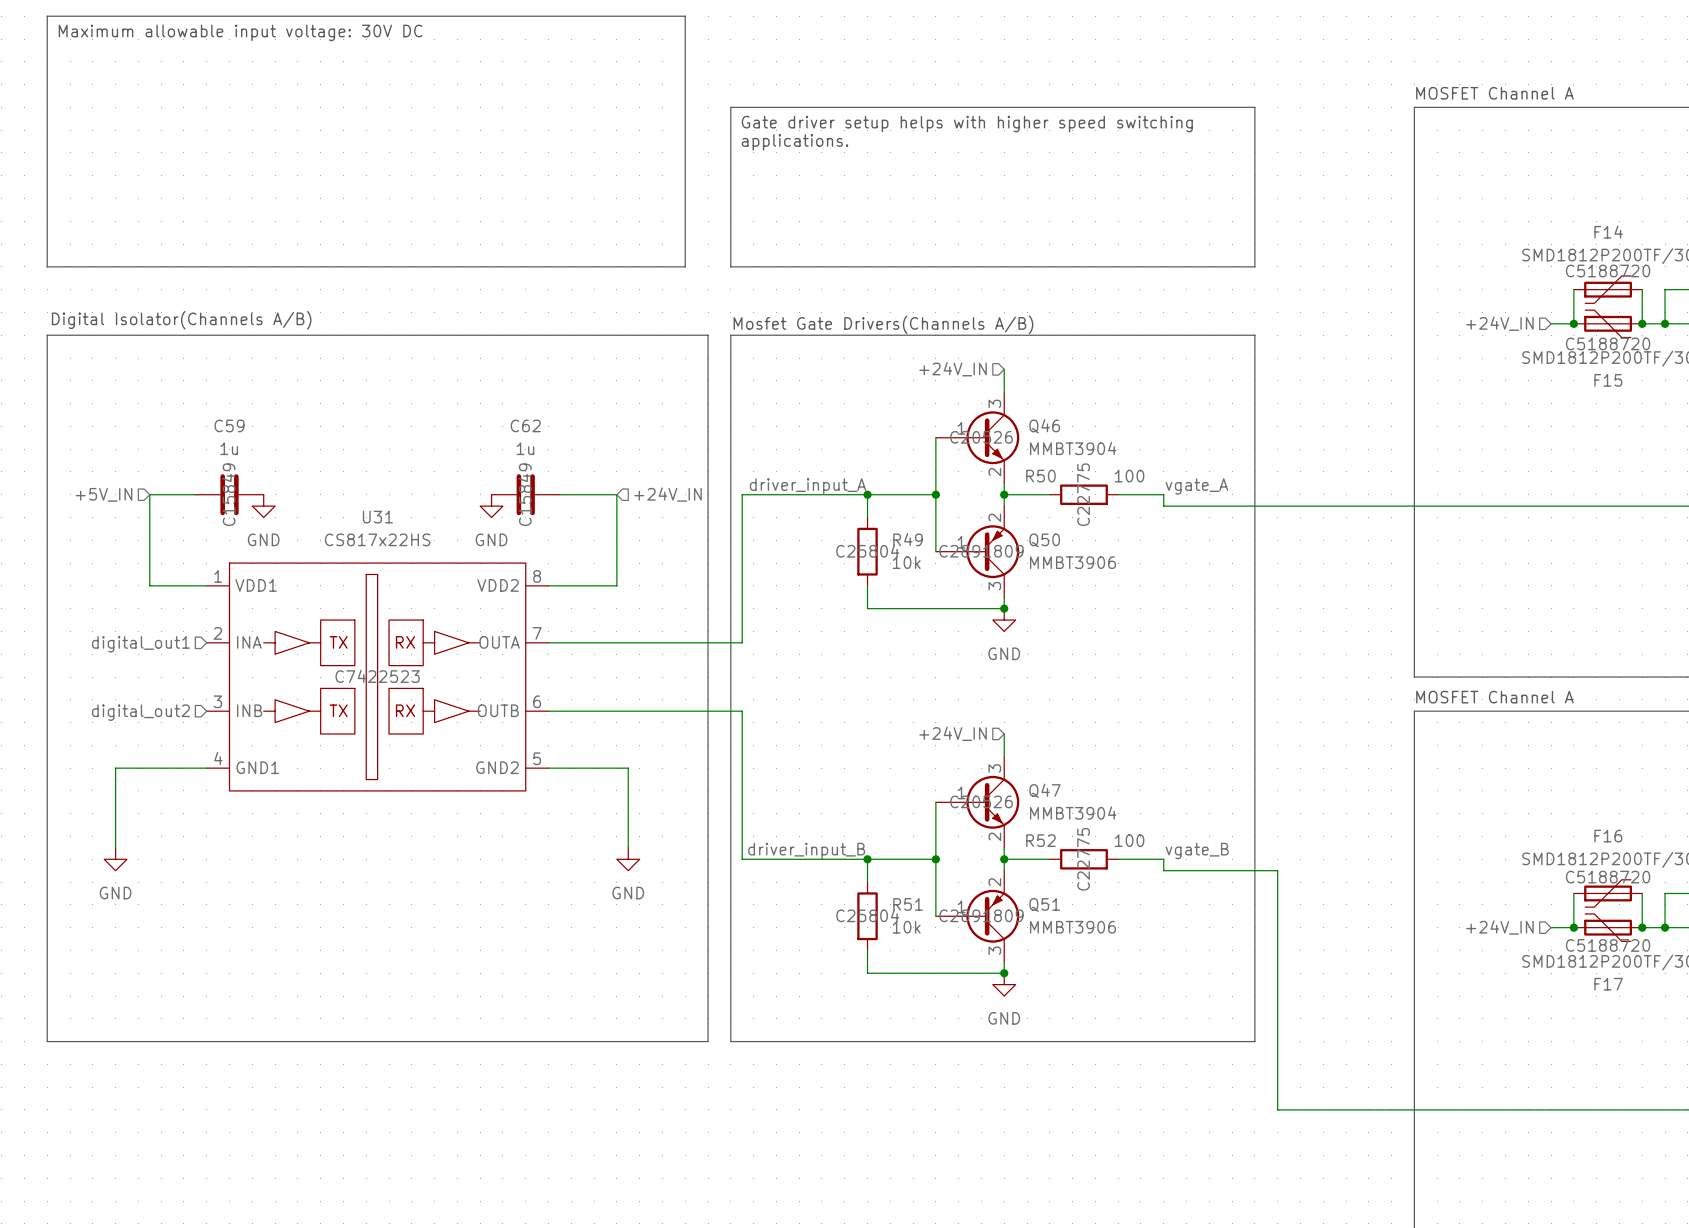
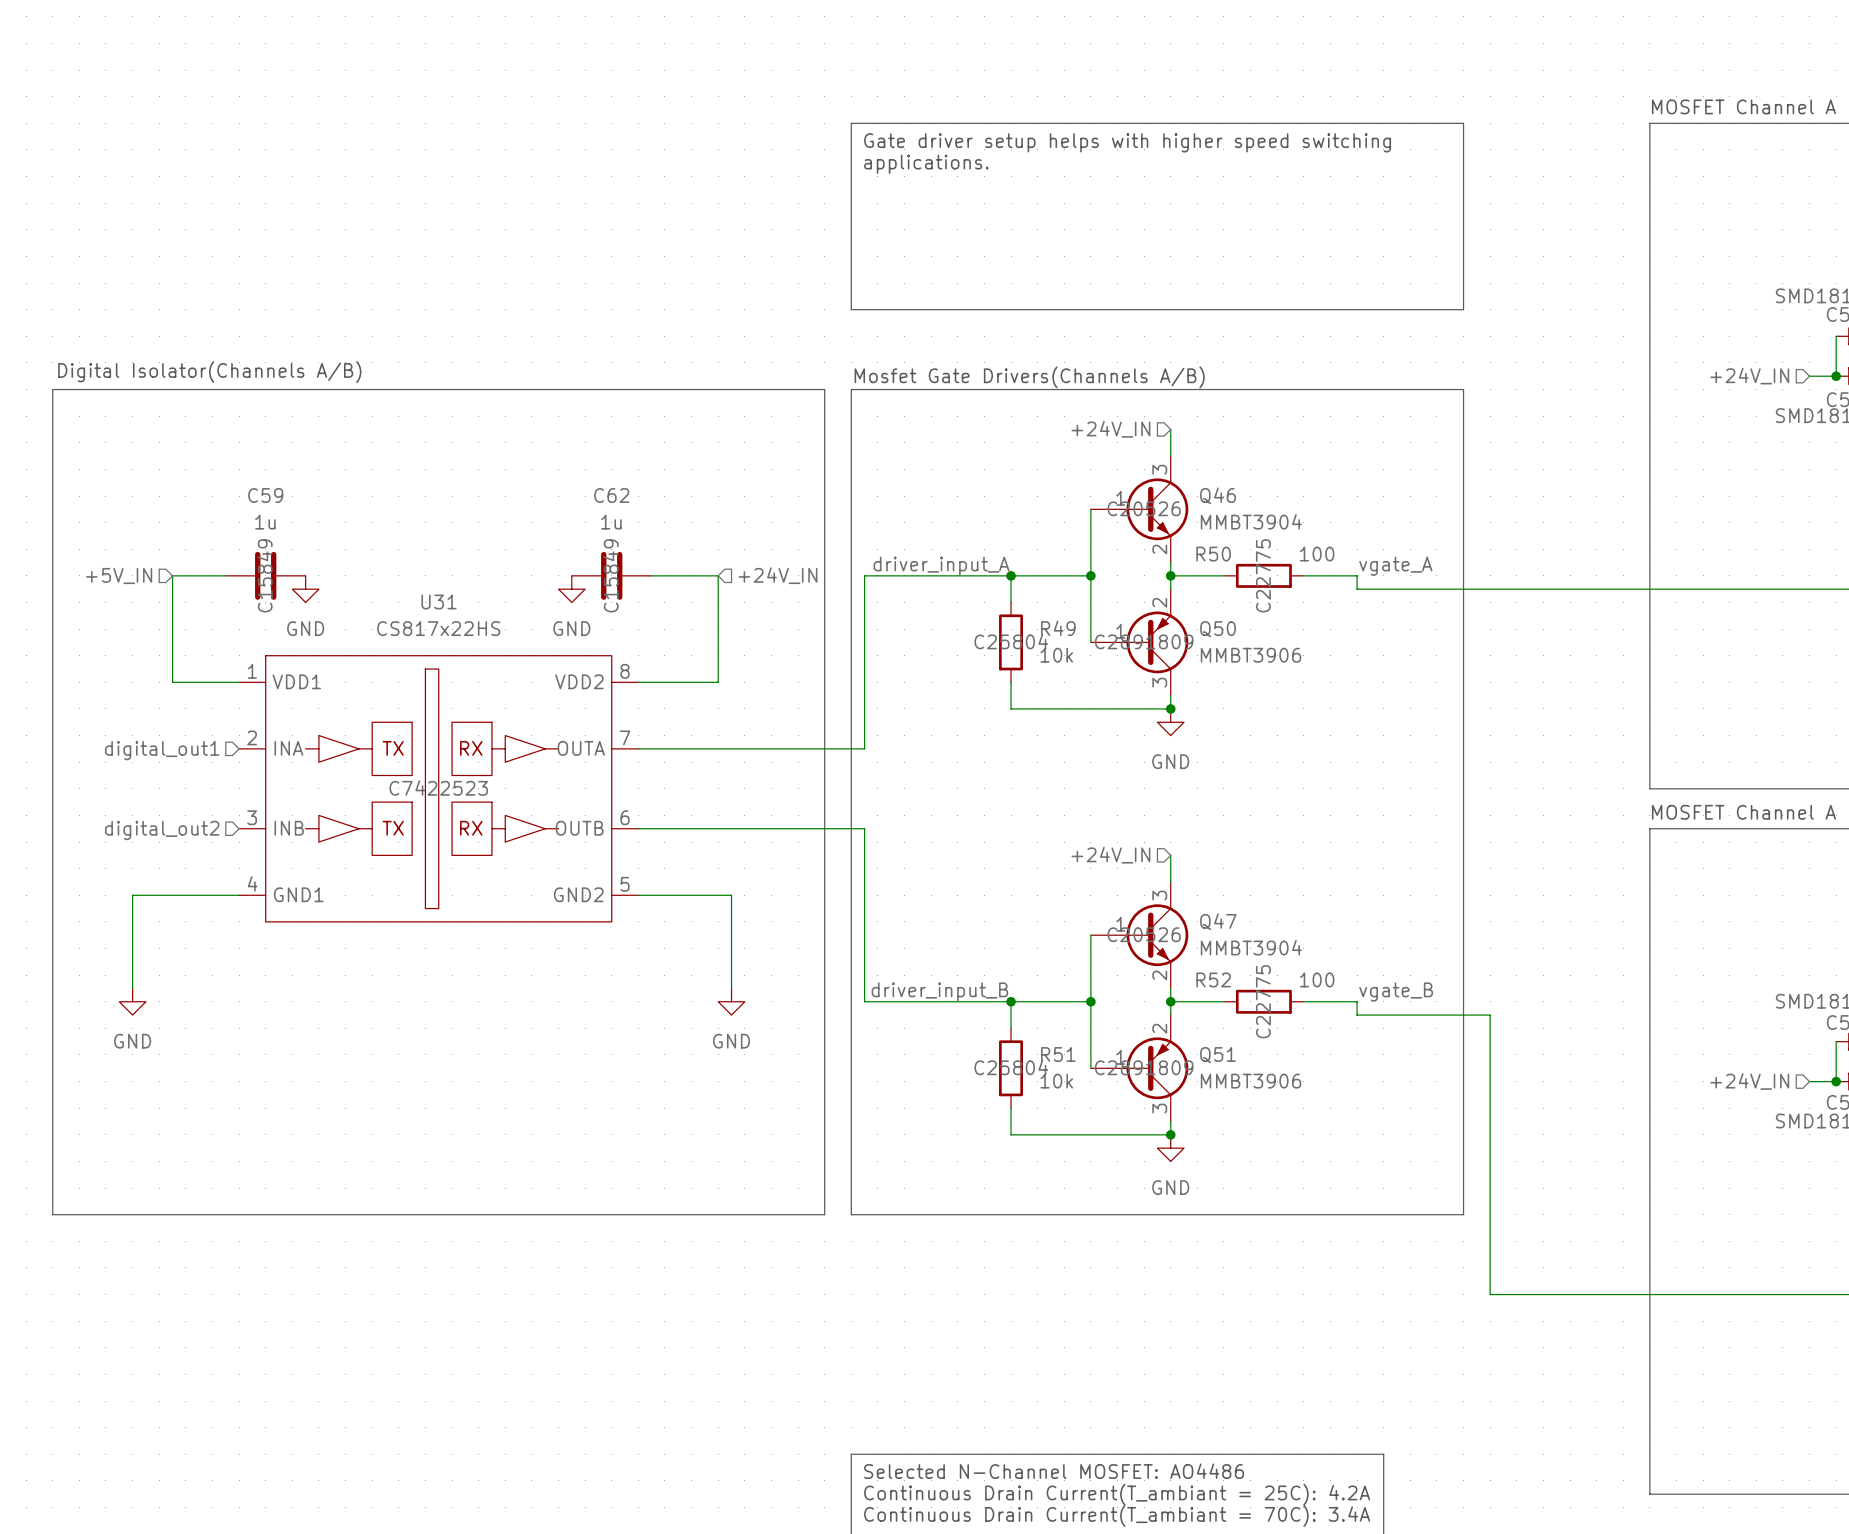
line: (47, 16) (685, 16) (685, 266) (47, 266) (47, 16) -> none
text: Maximum allowable input voltage: 30V DC (240, 32) -> none

